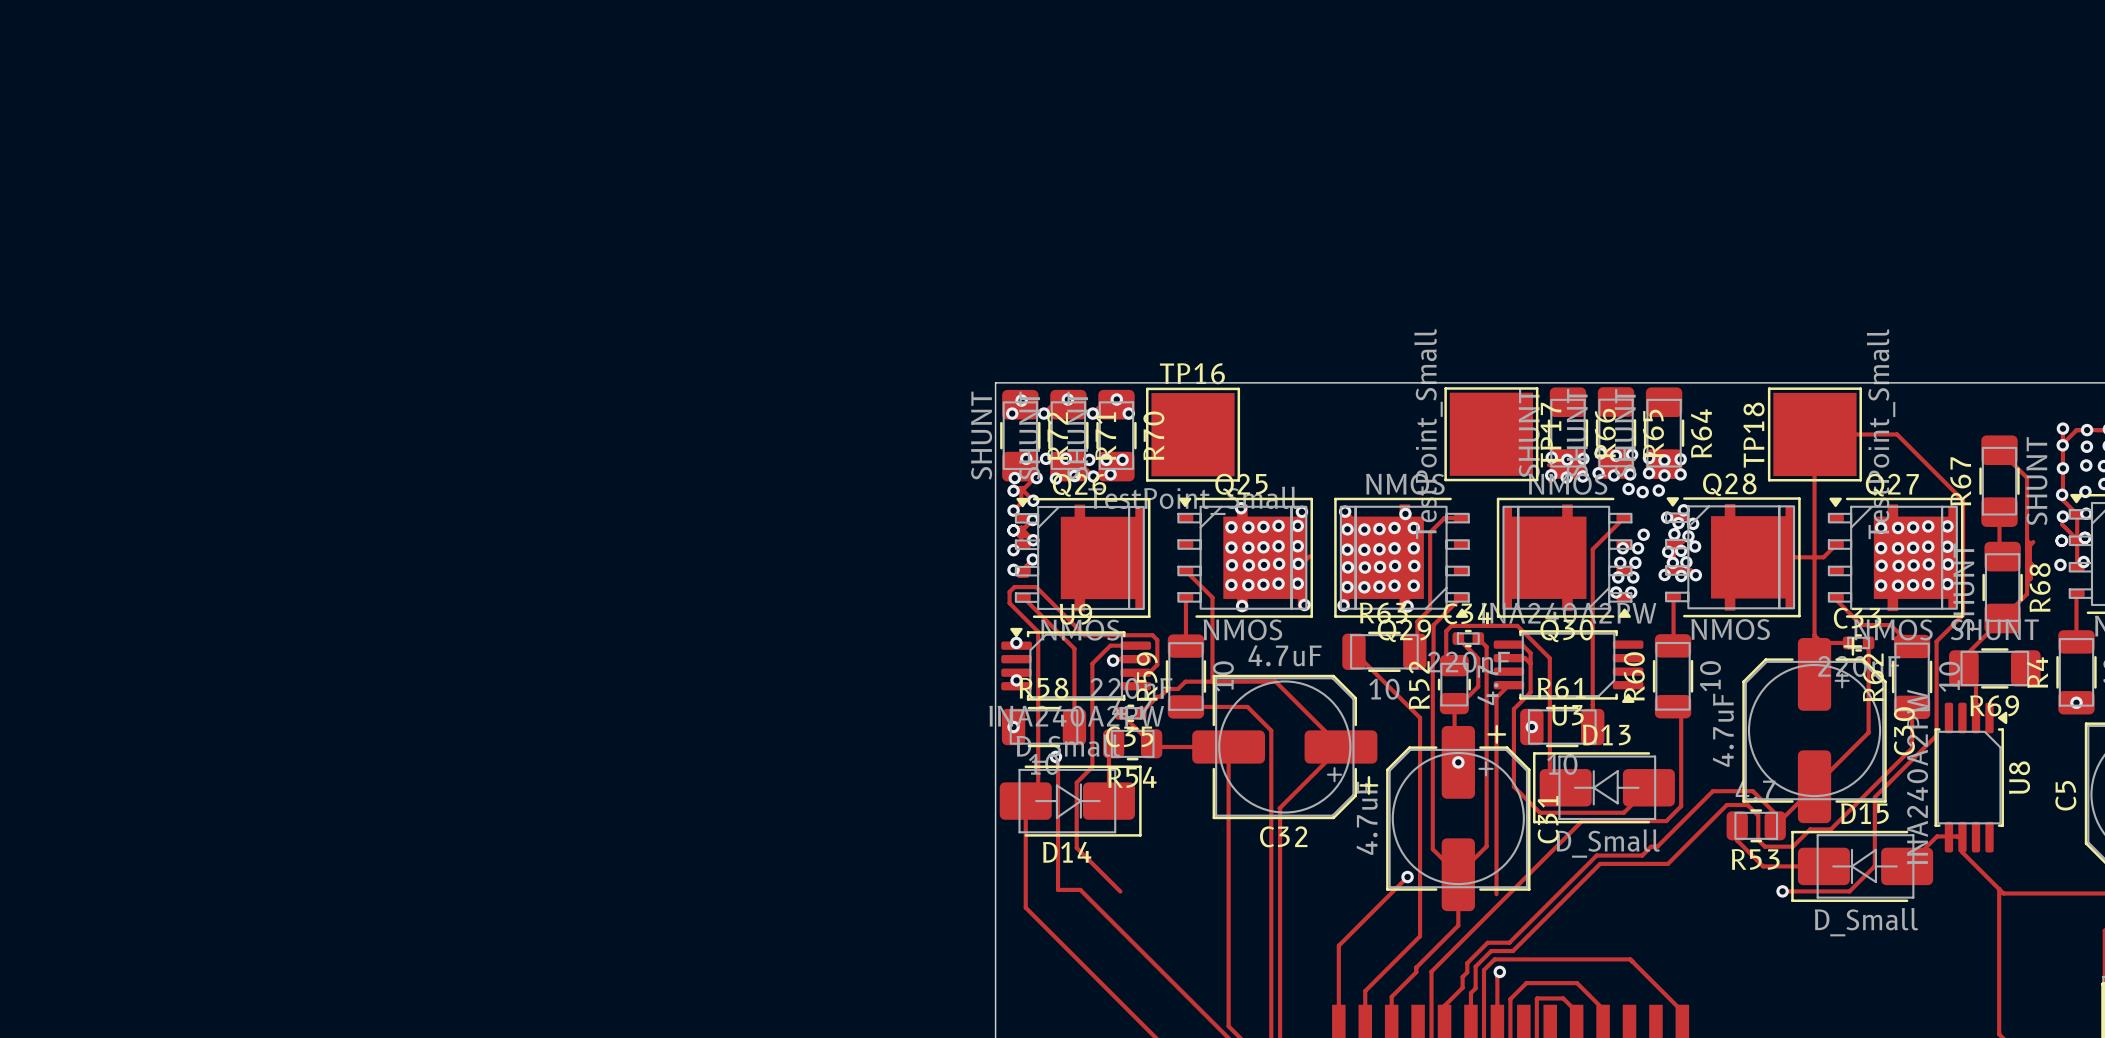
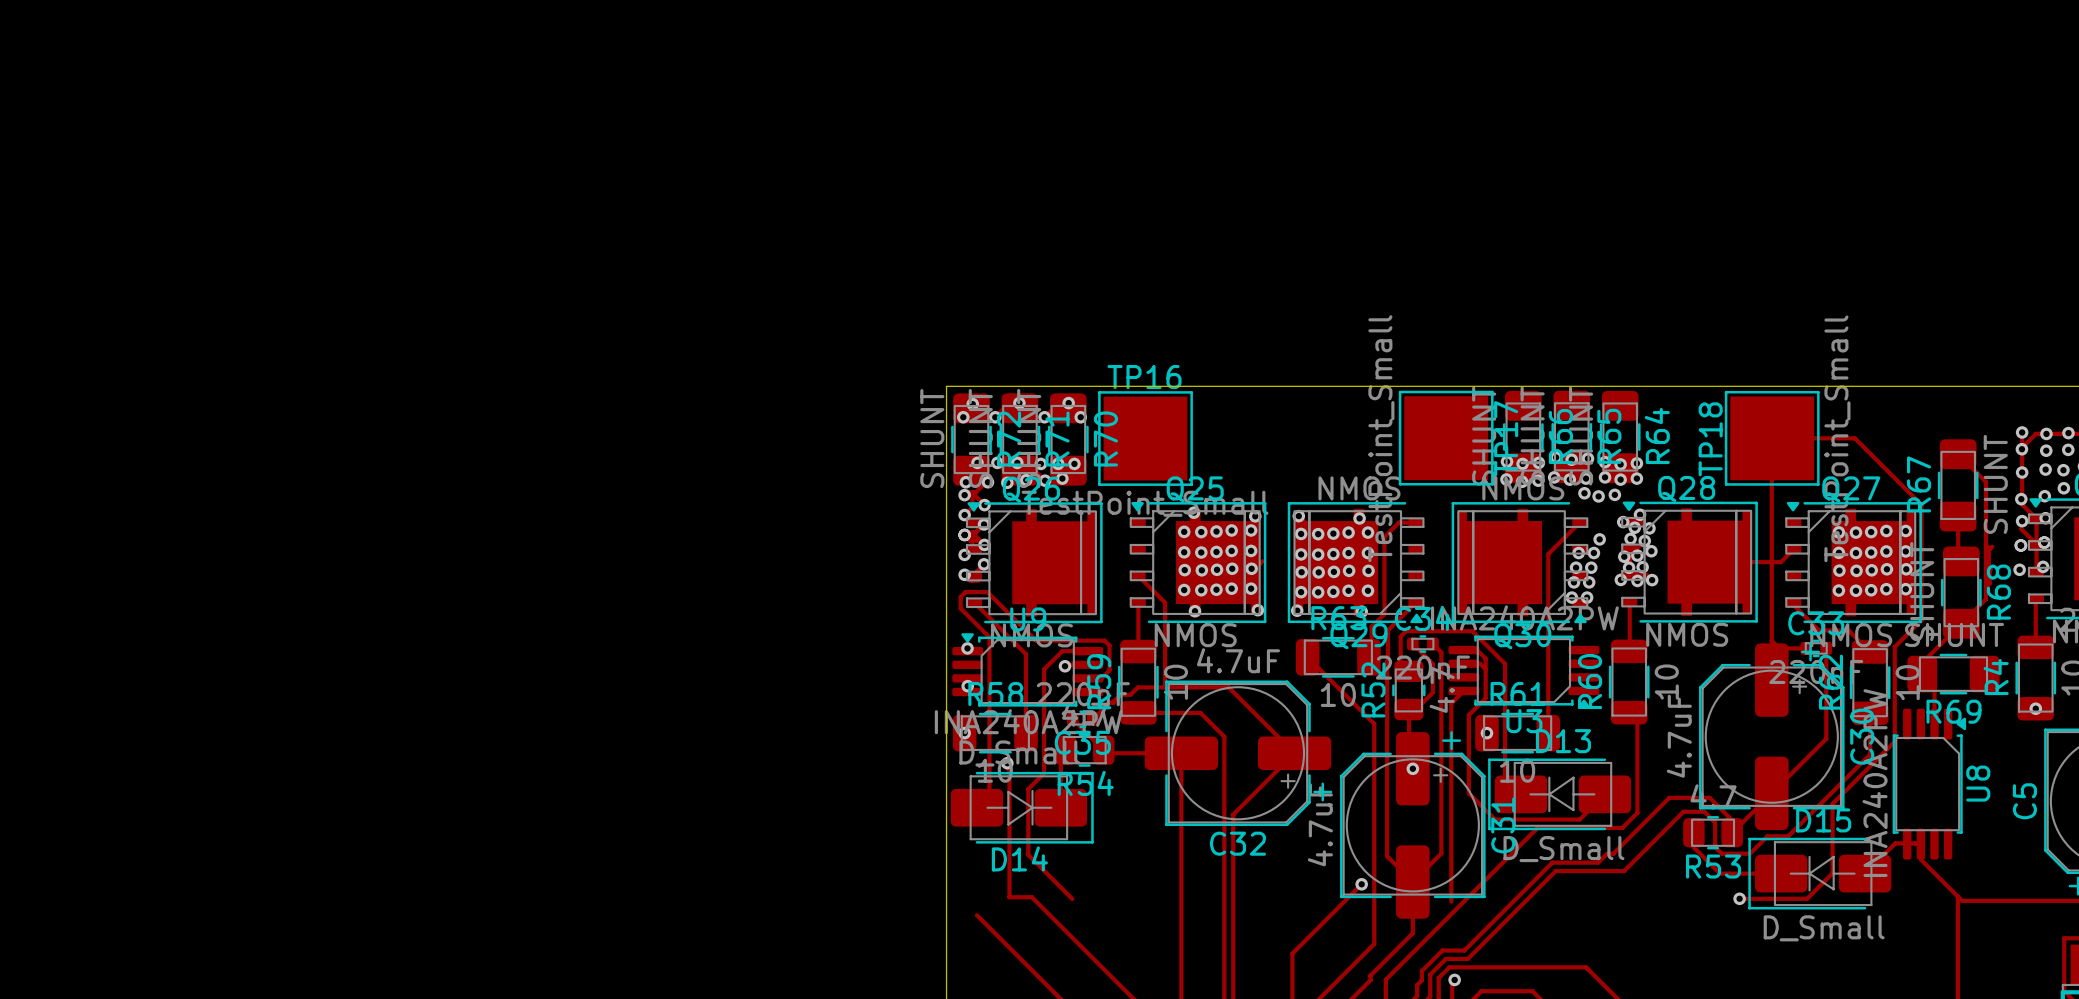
track: (1025, 801) (1025, 907) -> none

